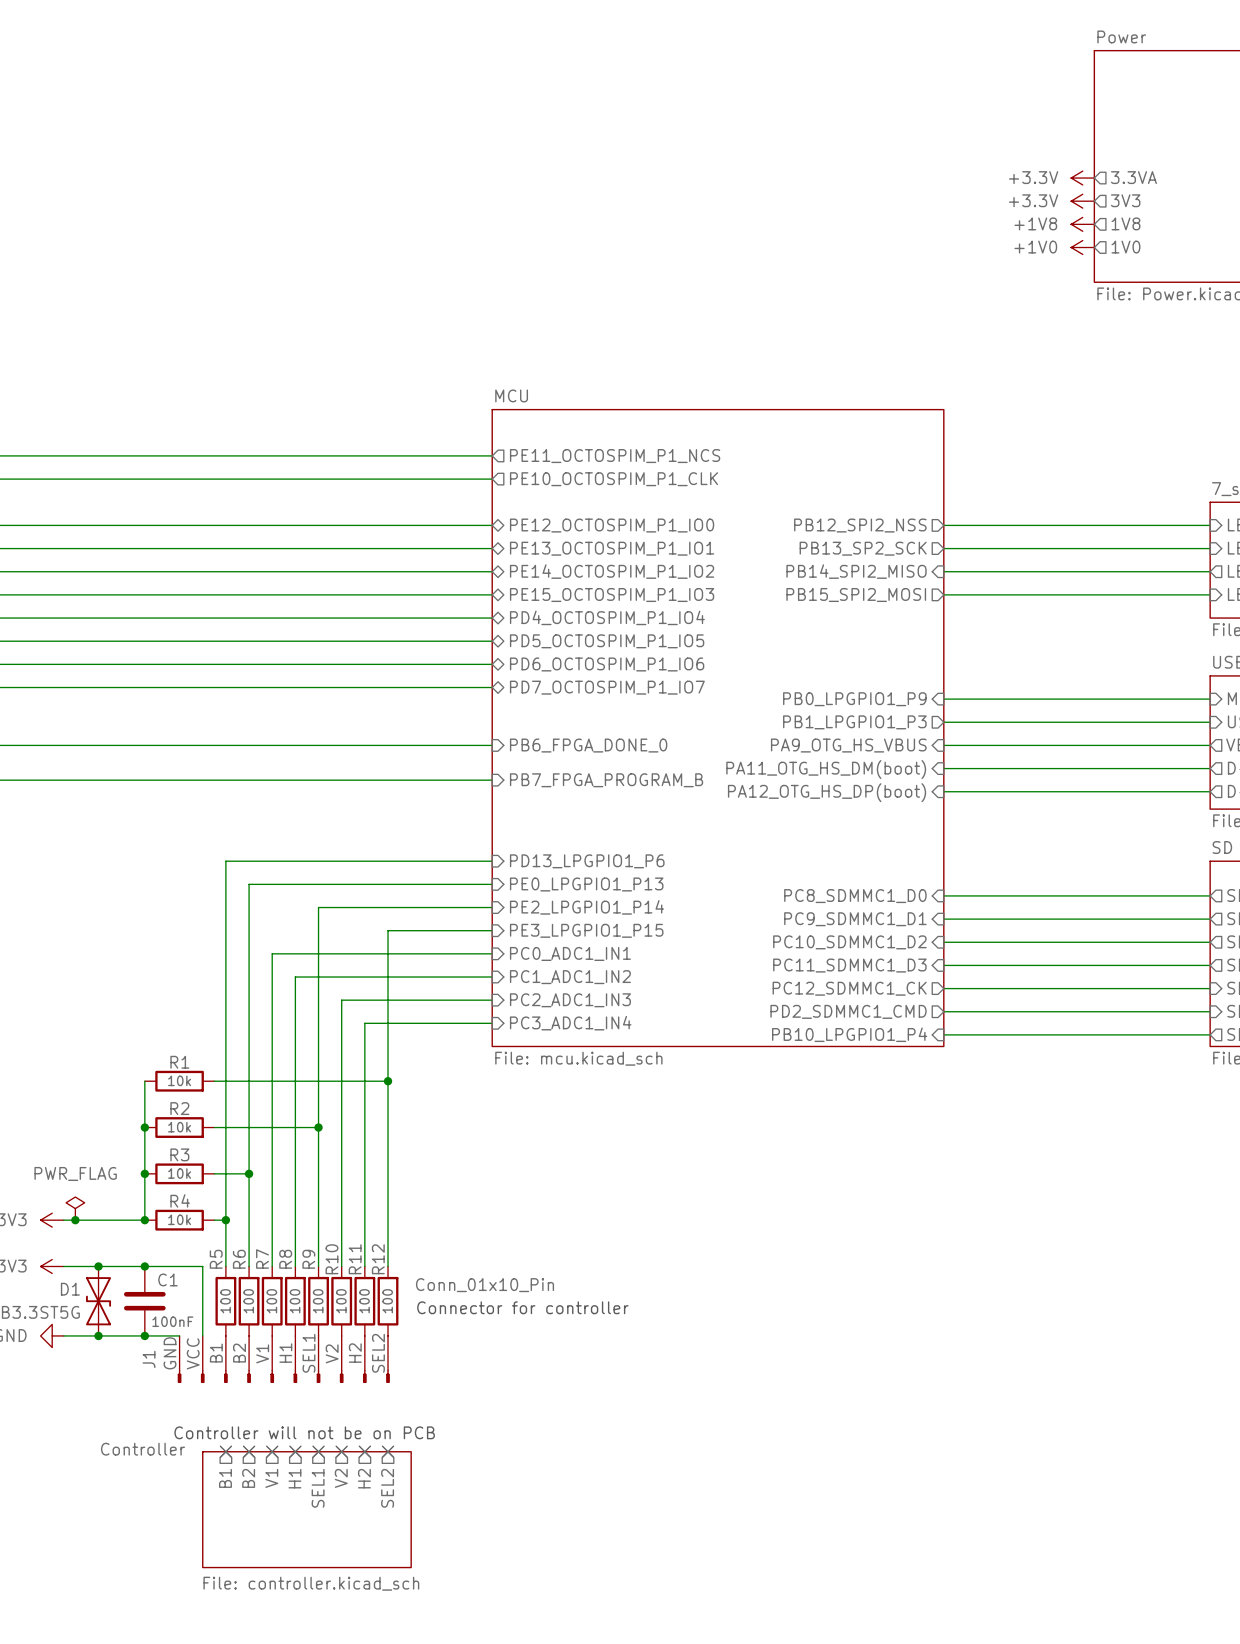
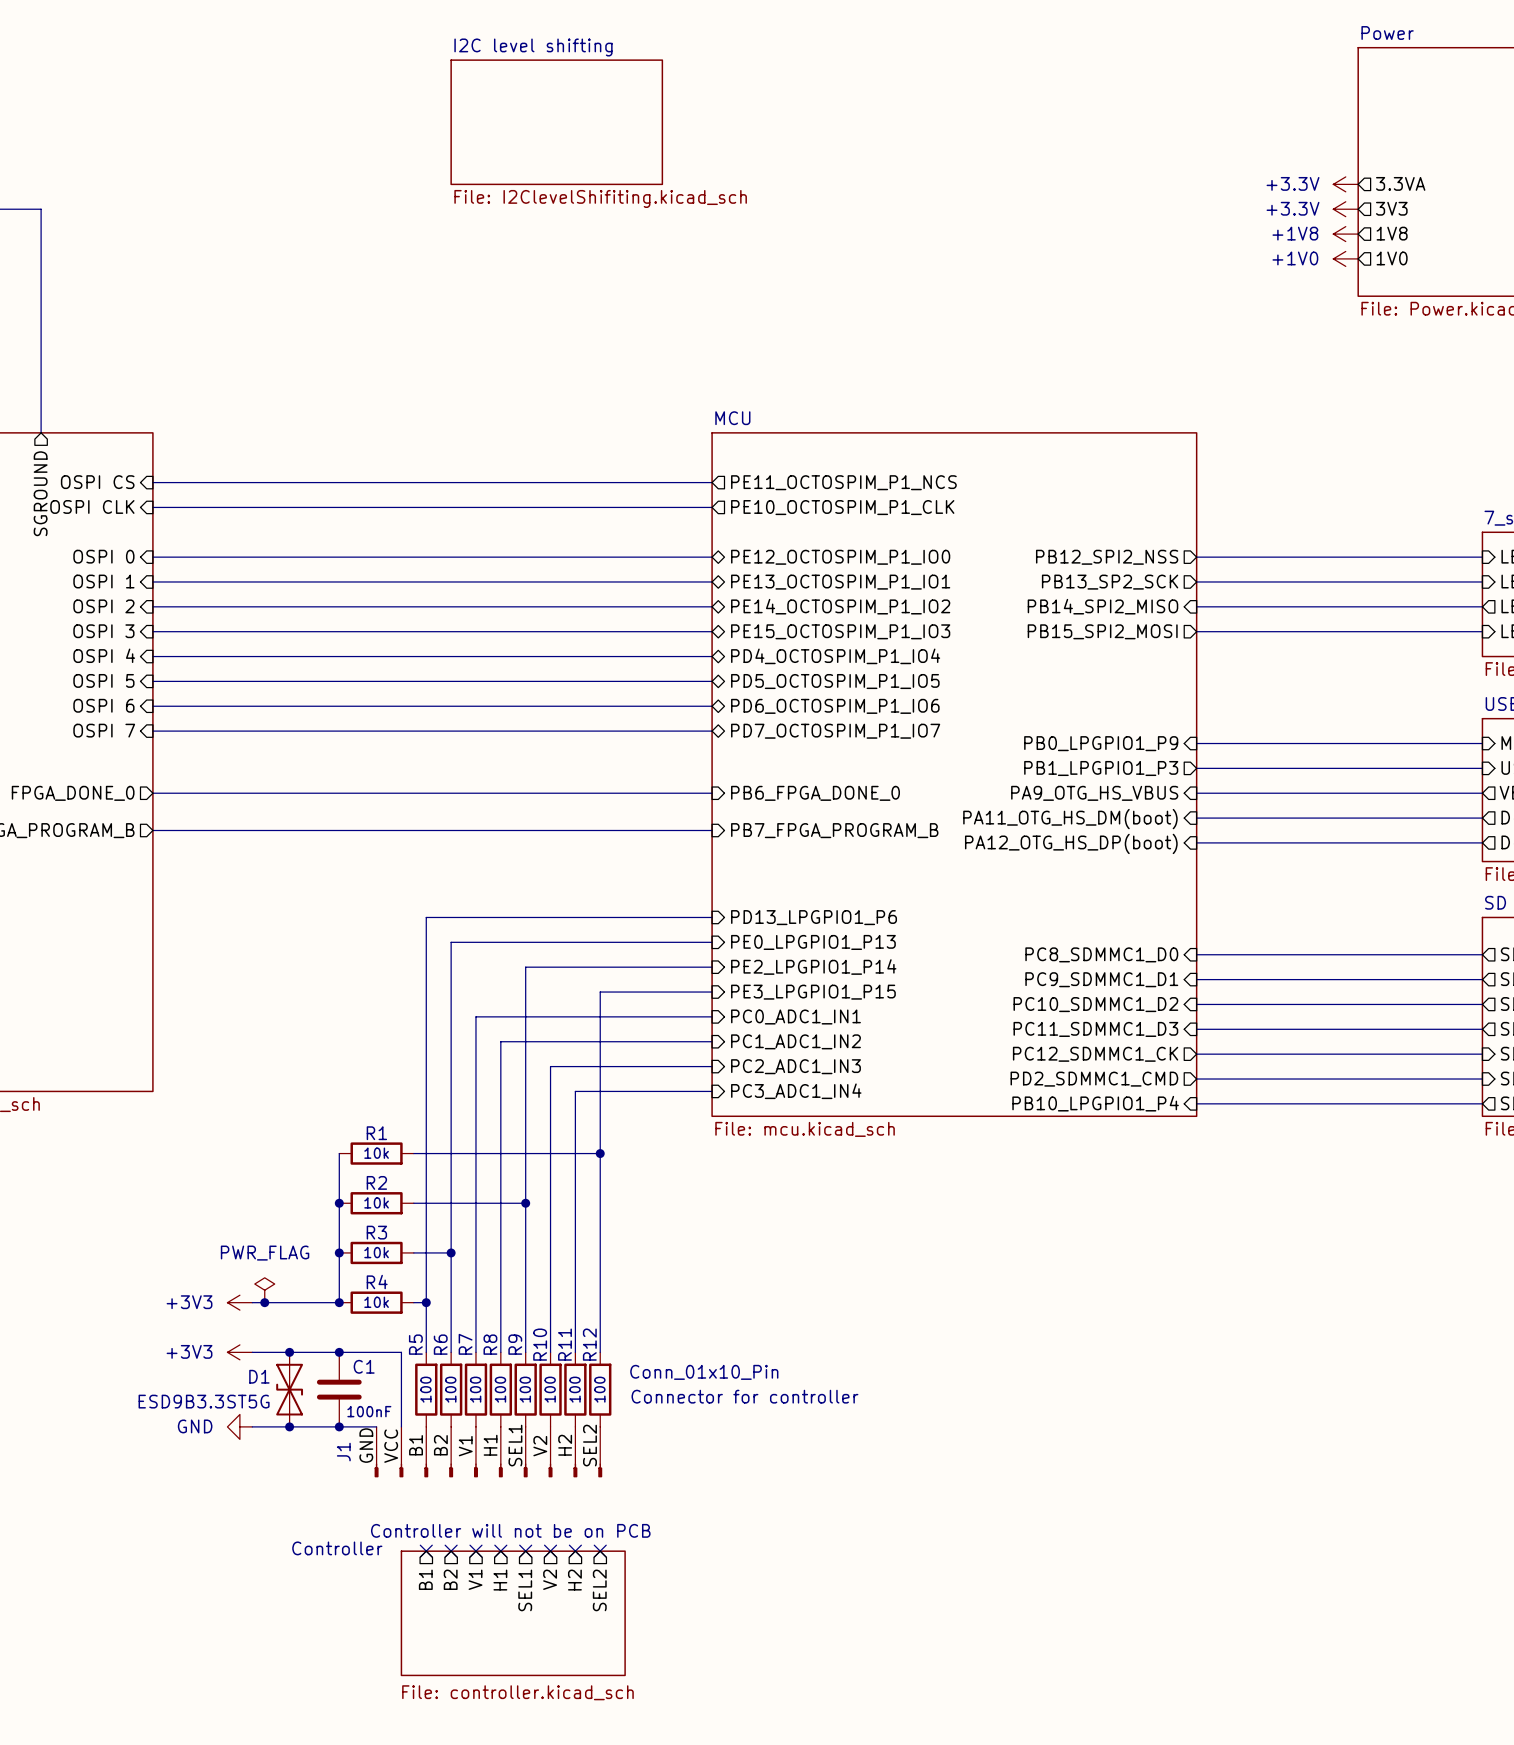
sheet I2C level shifting: none -> File: I2ClevelShifiting.kicad_sch (556, 122)

